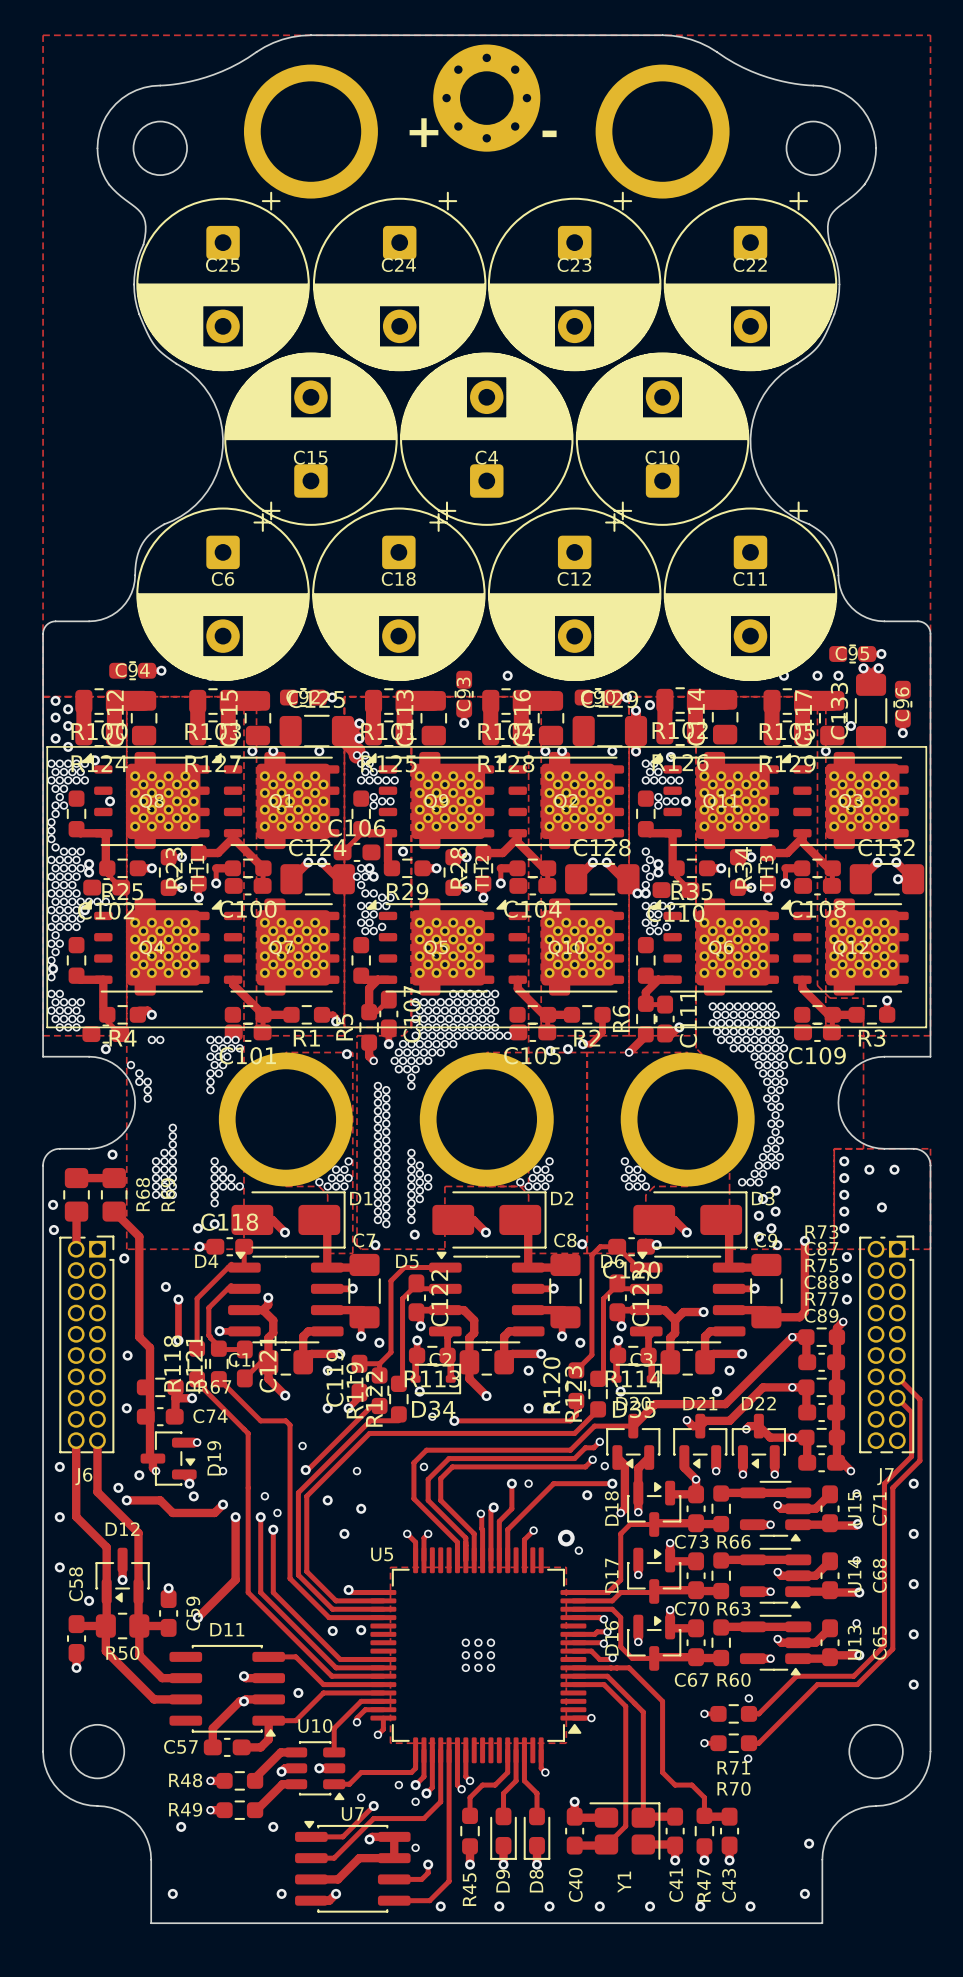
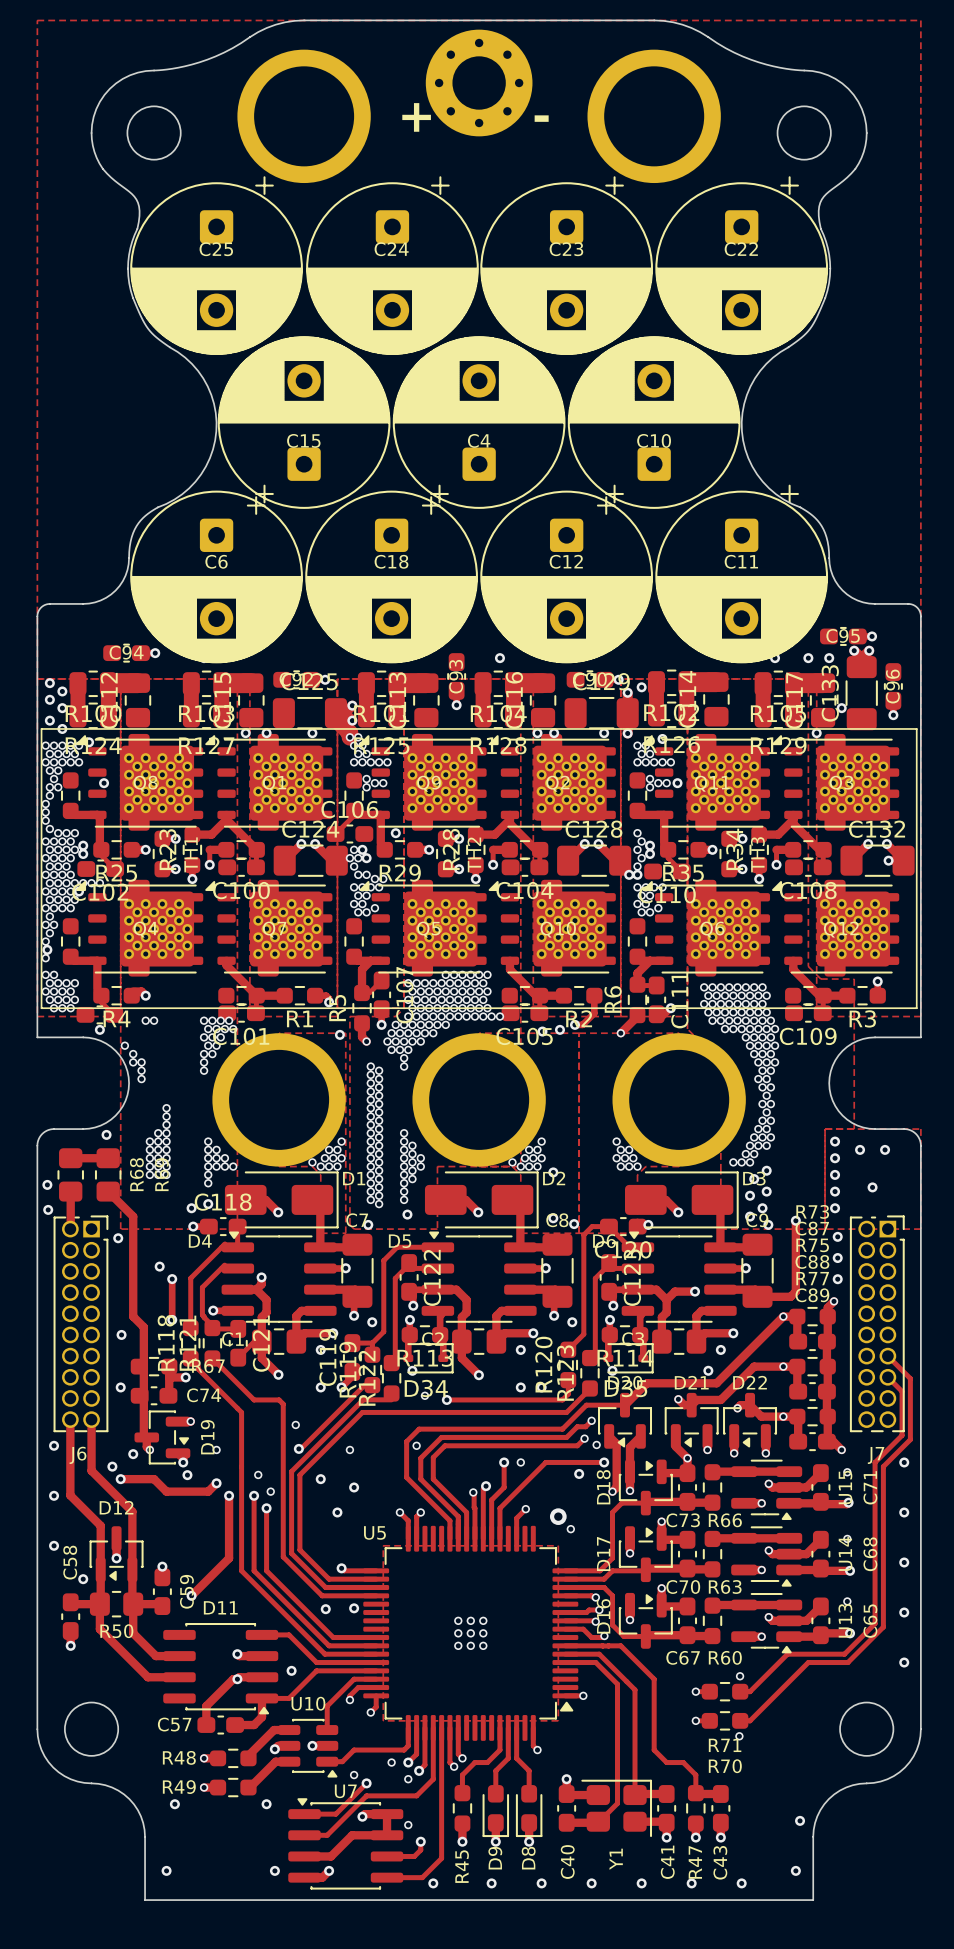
via: none -> (553, 1172)
via: none -> (553, 1218)

